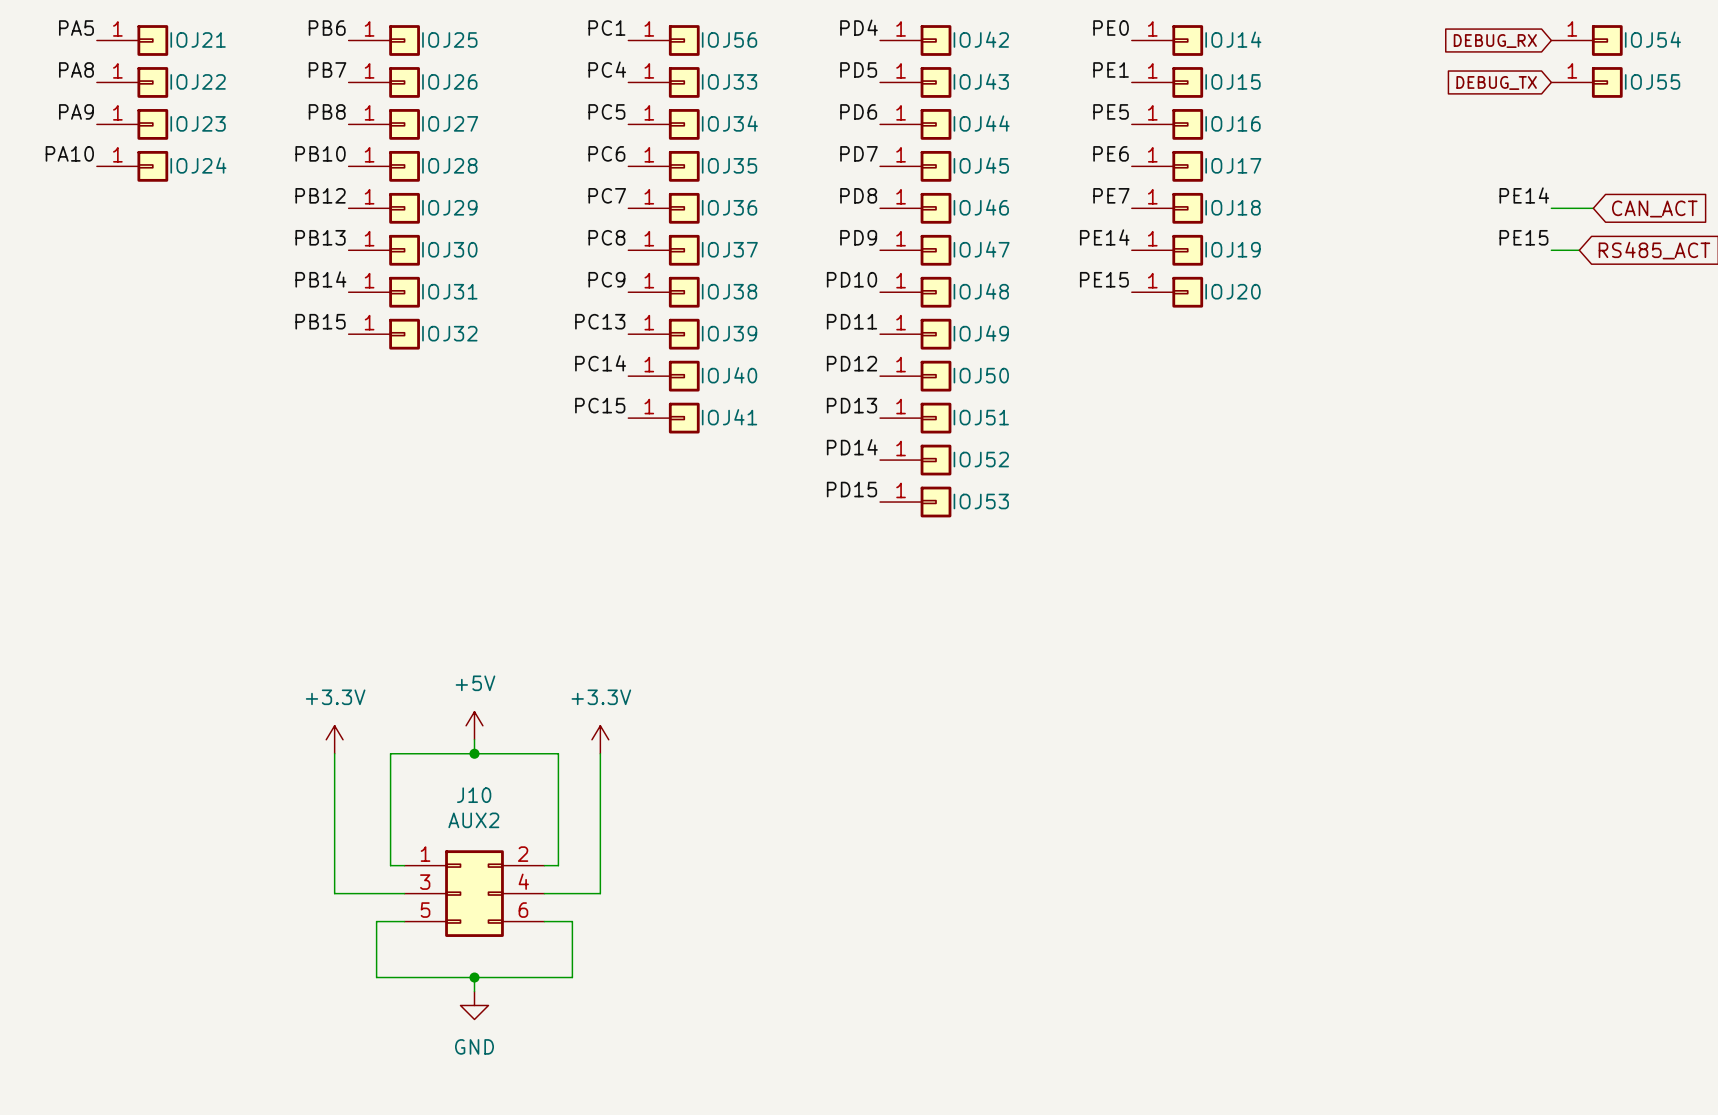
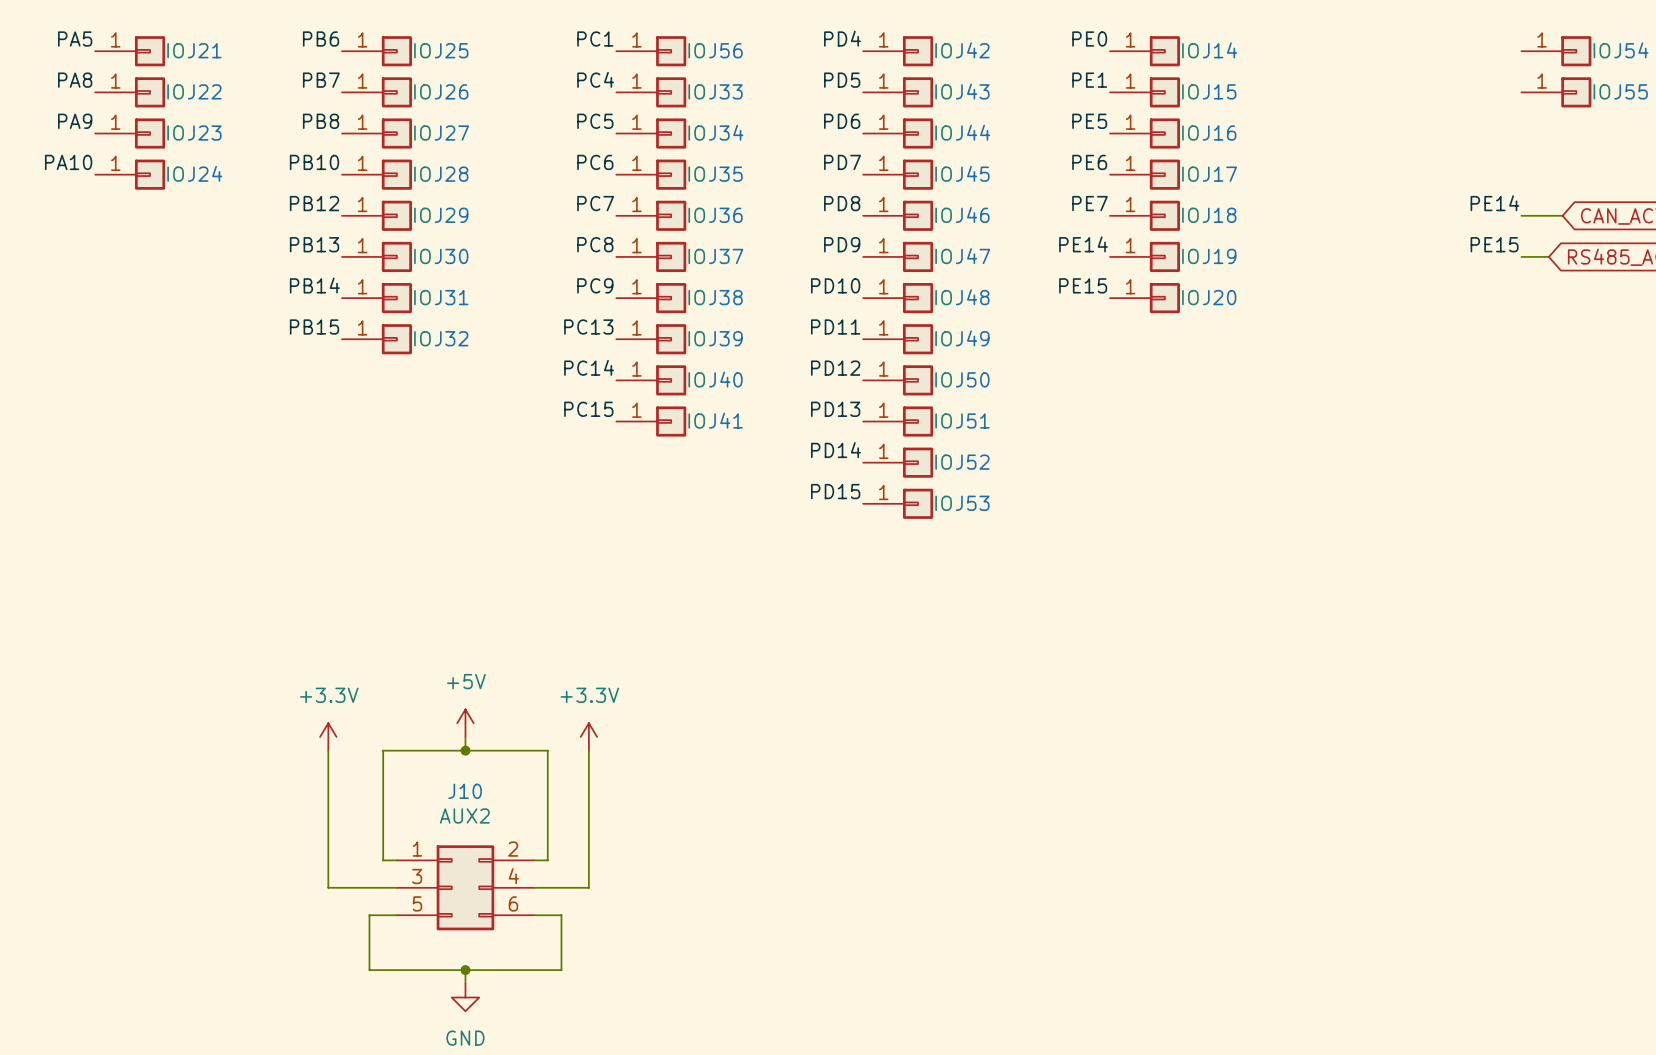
global label: DEBUG_RX (1495, 41) -> none
global label: DEBUG_TX (1496, 82) -> none

